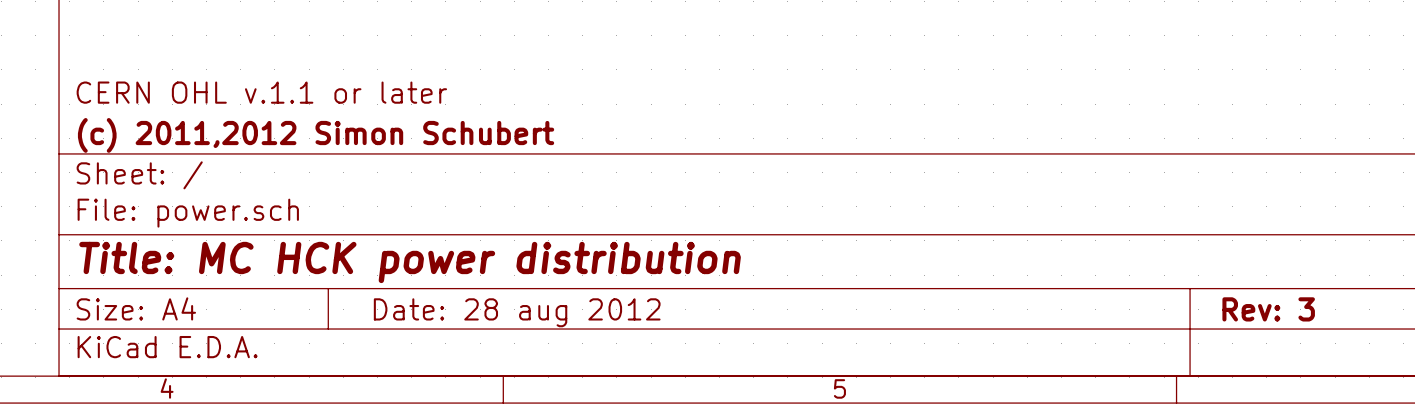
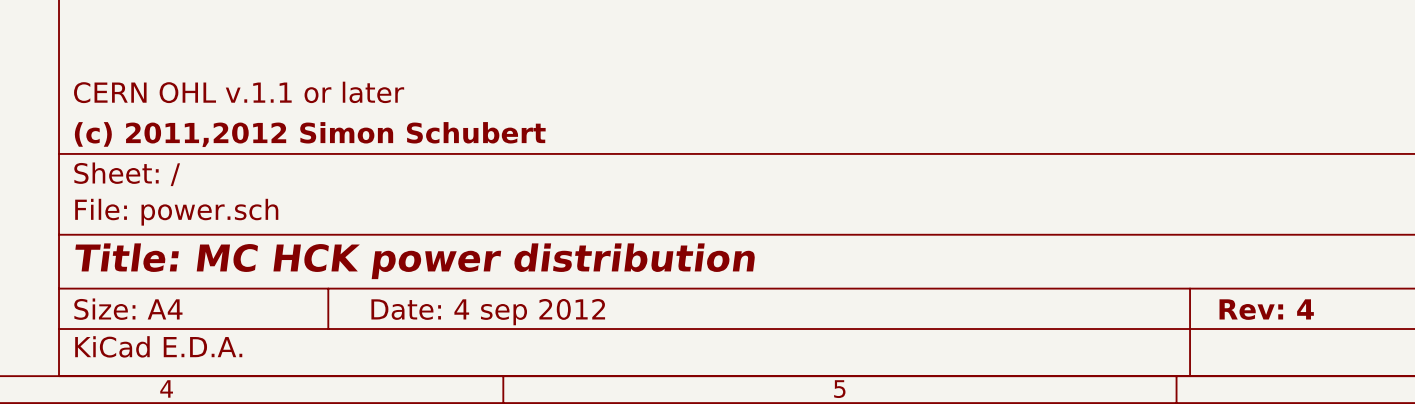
title block: Rev: 3 (1268, 309) -> Rev: 4 (1266, 309)
title block: Date: 28 aug 2012 (517, 312) -> Date: 4 sep 2012 (488, 312)

